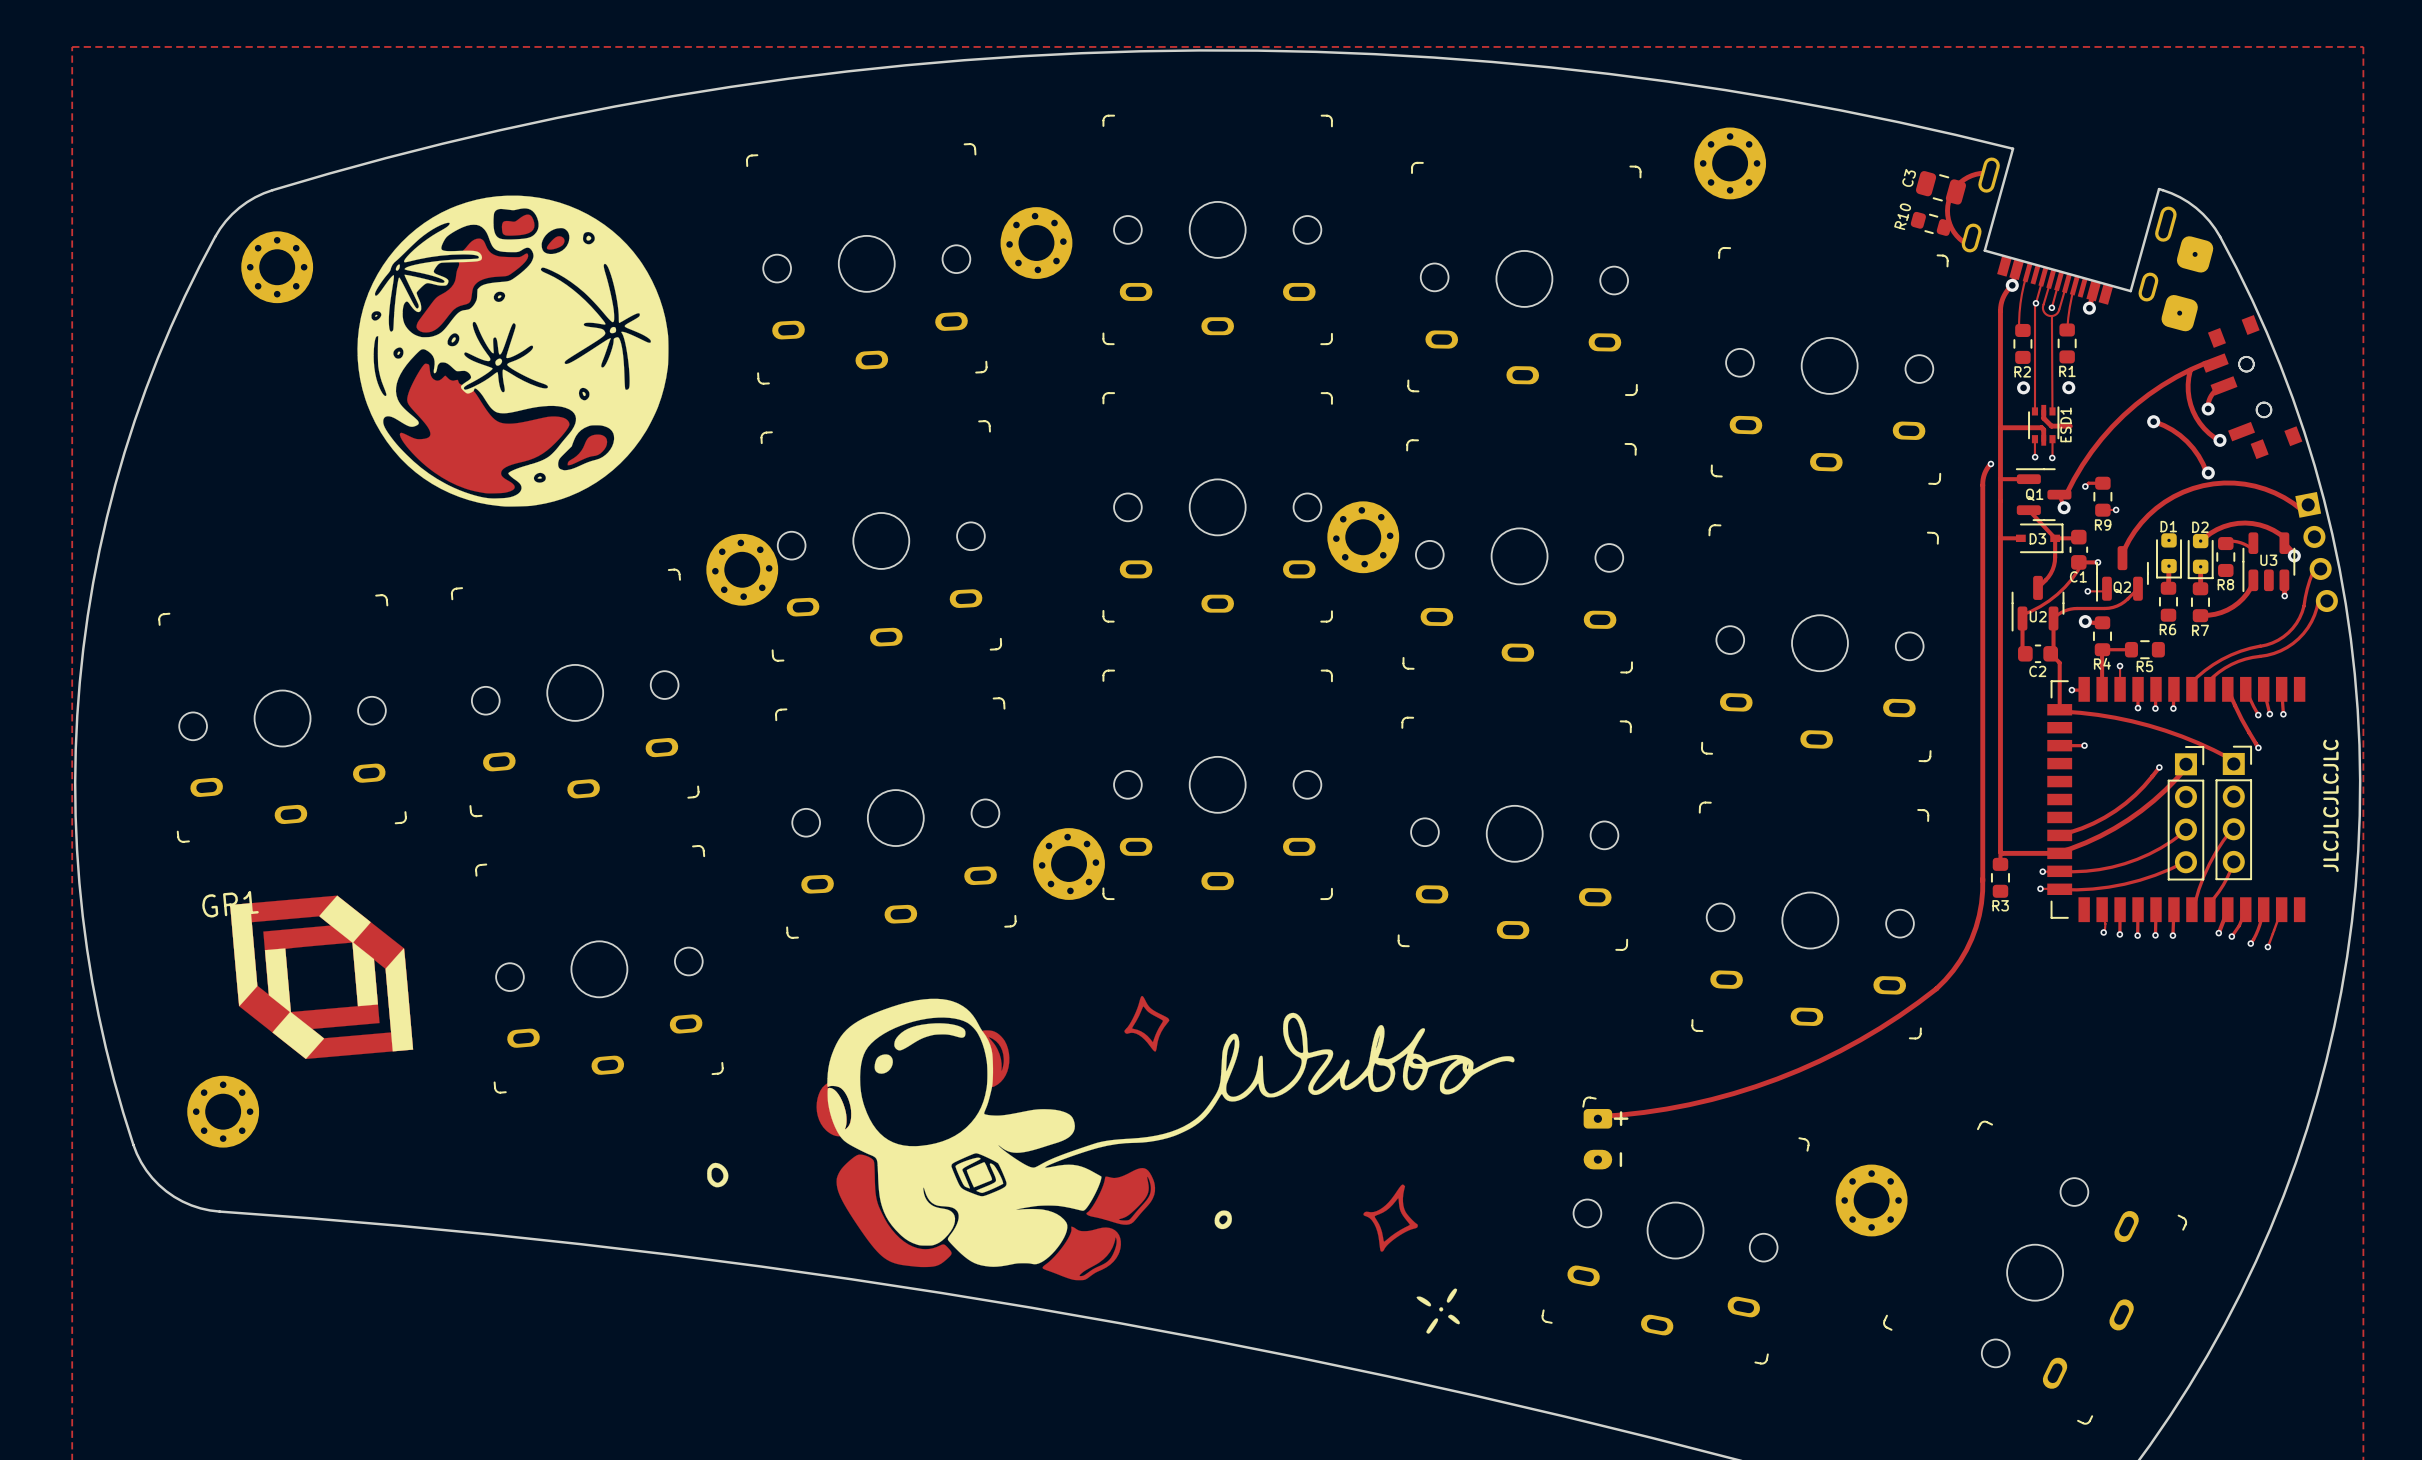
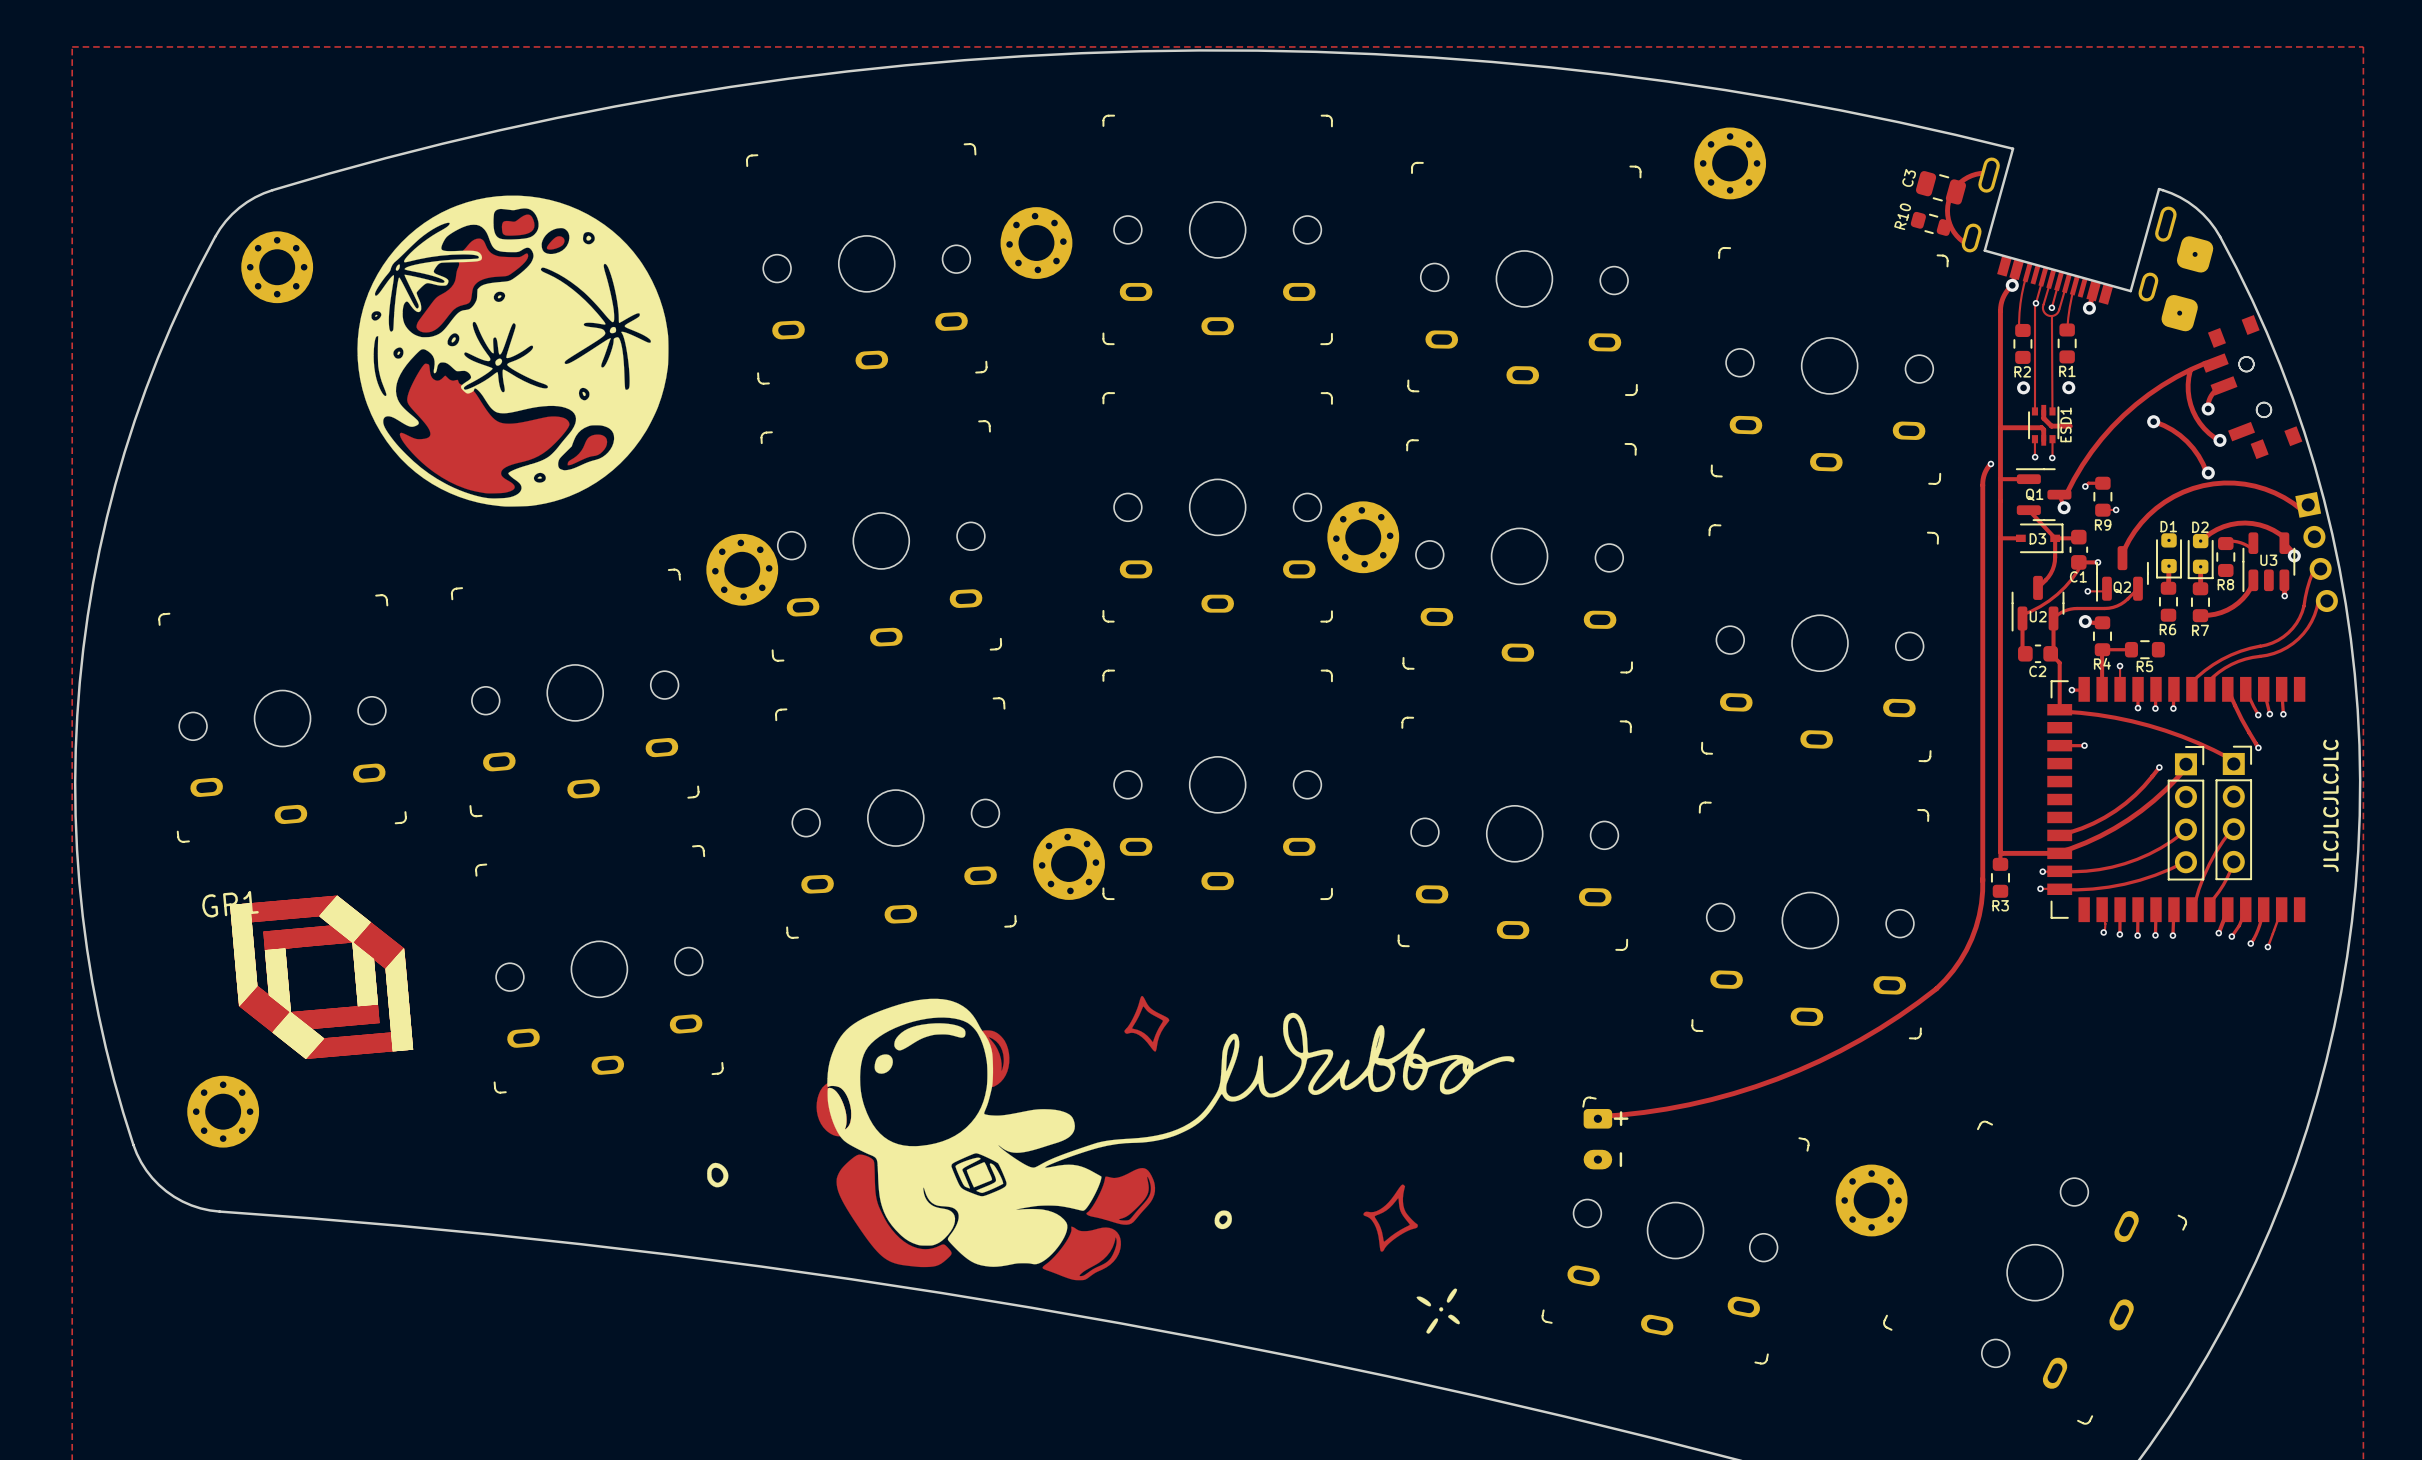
drawing: none -> [230, 895, 414, 1060]

